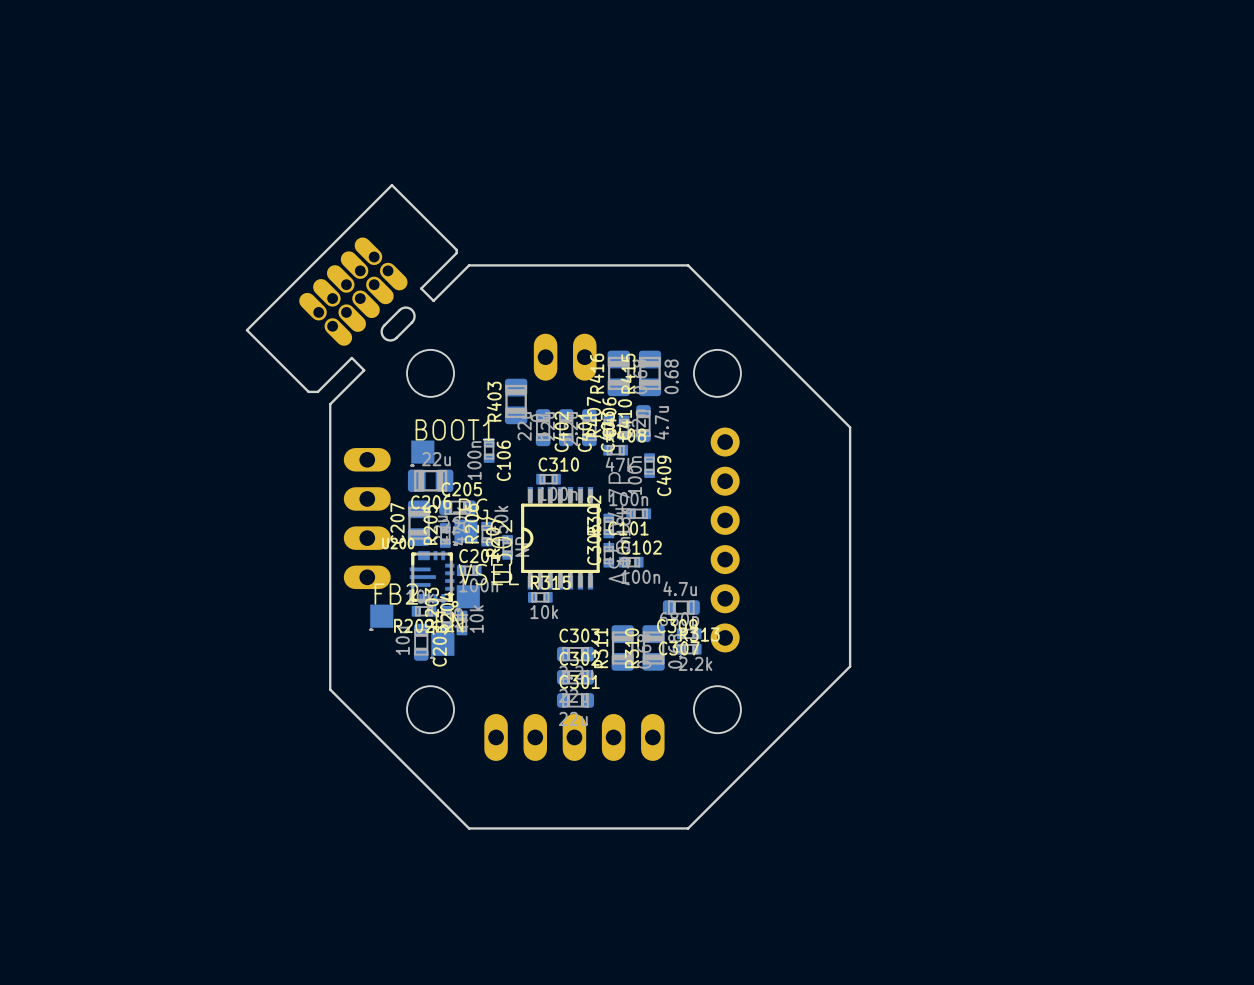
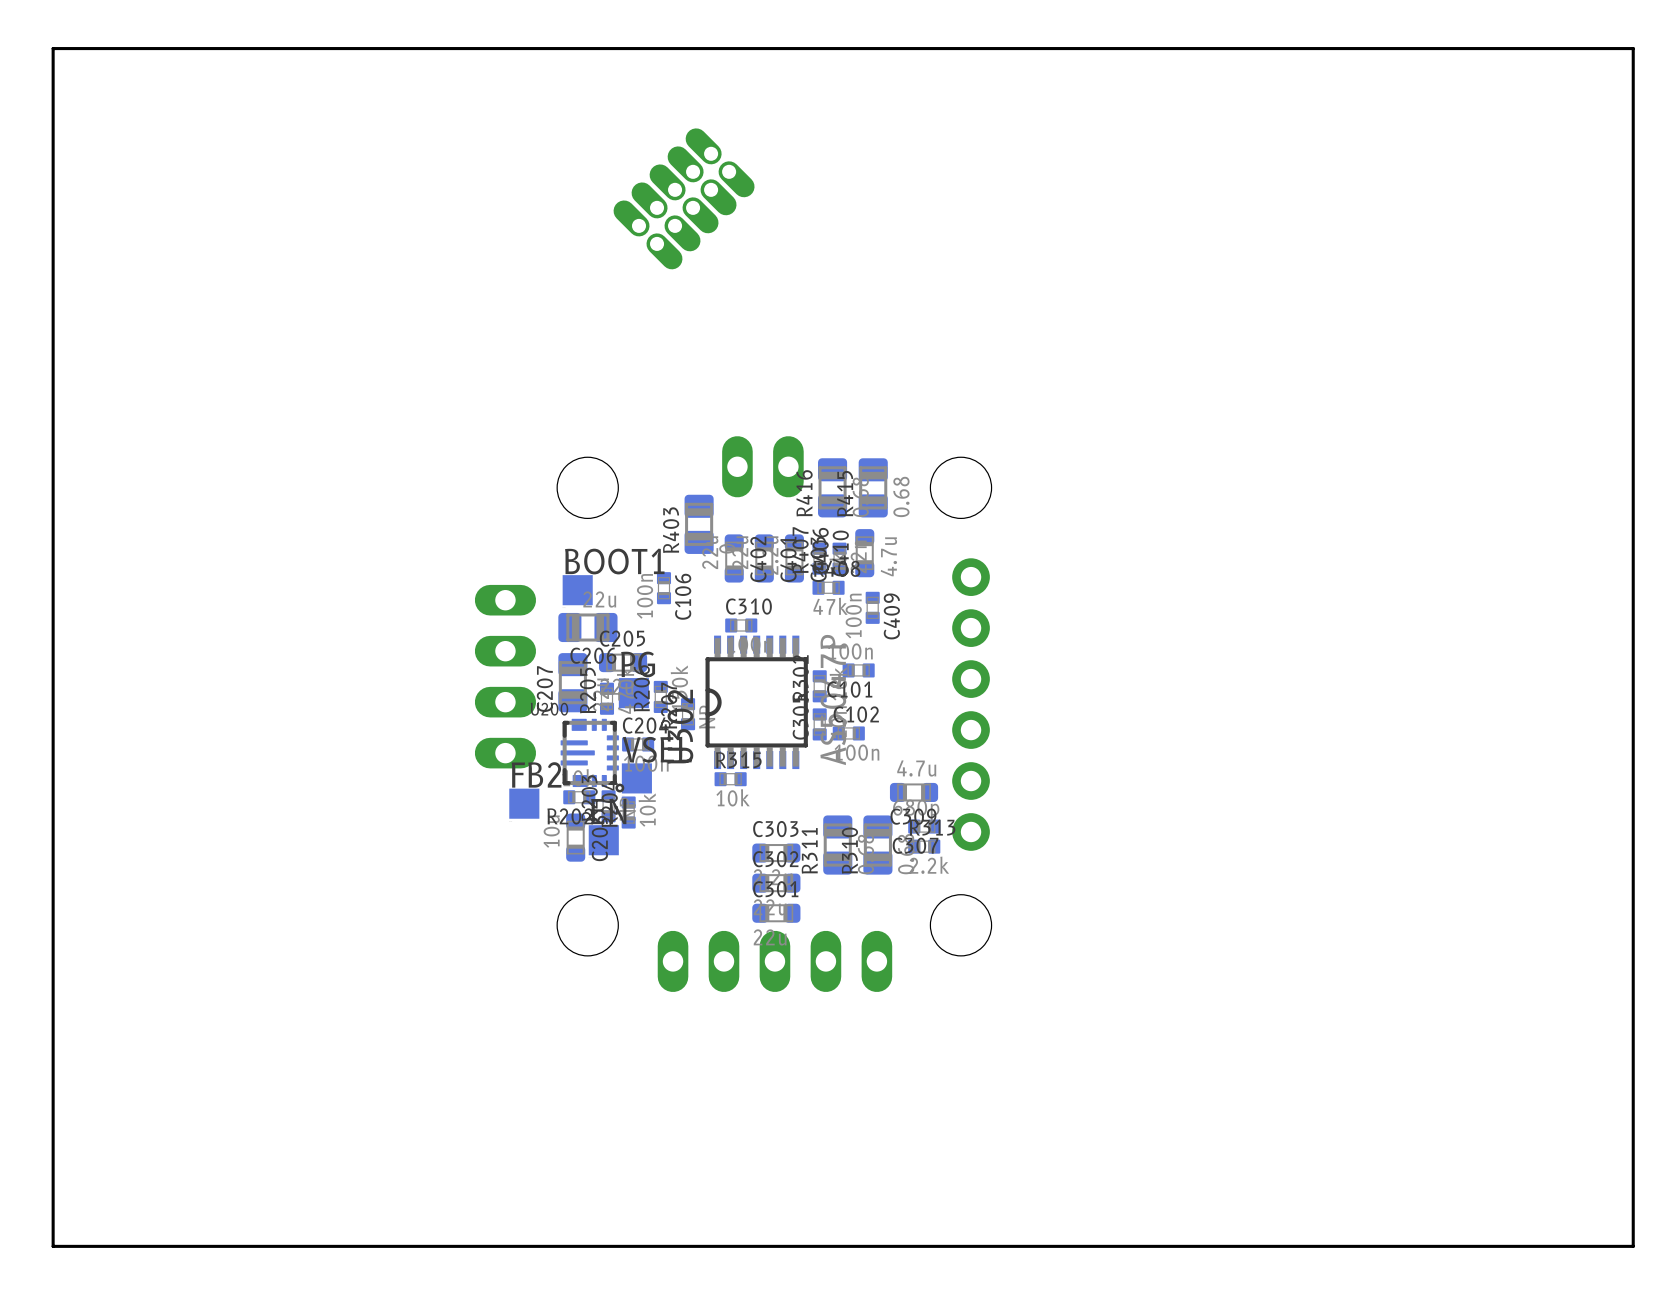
board edge: none -> (1633, 48) (1633, 1246) (53, 1246) (53, 48) (1633, 48)
board edge: (391, 185) (246, 330) (308, 391) (317, 391) (351, 357) (364, 370) (330, 404) (330, 689) (469, 828) (688, 828) (850, 666) (850, 427) (688, 265) (469, 265) (433, 300) (421, 288) (456, 253) (456, 249) (391, 185) -> none
part position: (353, 291) -> (684, 198)
board edge: (399, 310) (382, 328) (382, 335) (387, 339) (395, 338) (413, 319) (414, 314) (411, 309) (405, 307) (399, 310) -> none

